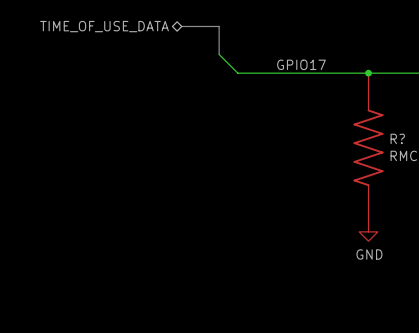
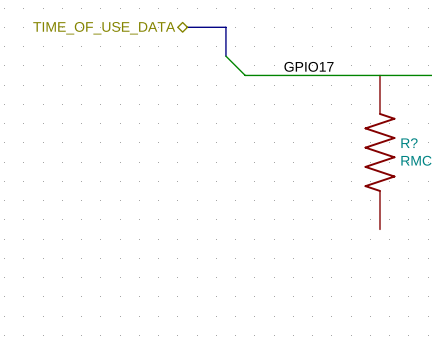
junction: (368, 73) -> none
power symbol: GND (368, 231) -> none

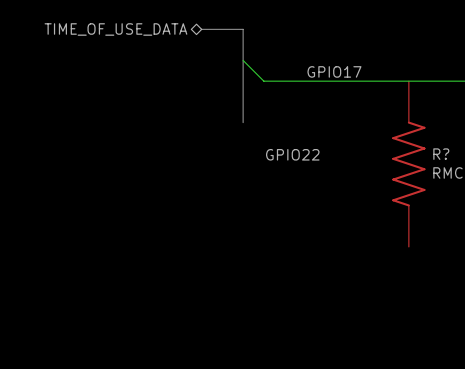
bus: none -> (243, 60) (243, 122)
label: none -> GPIO22 (292, 154)

